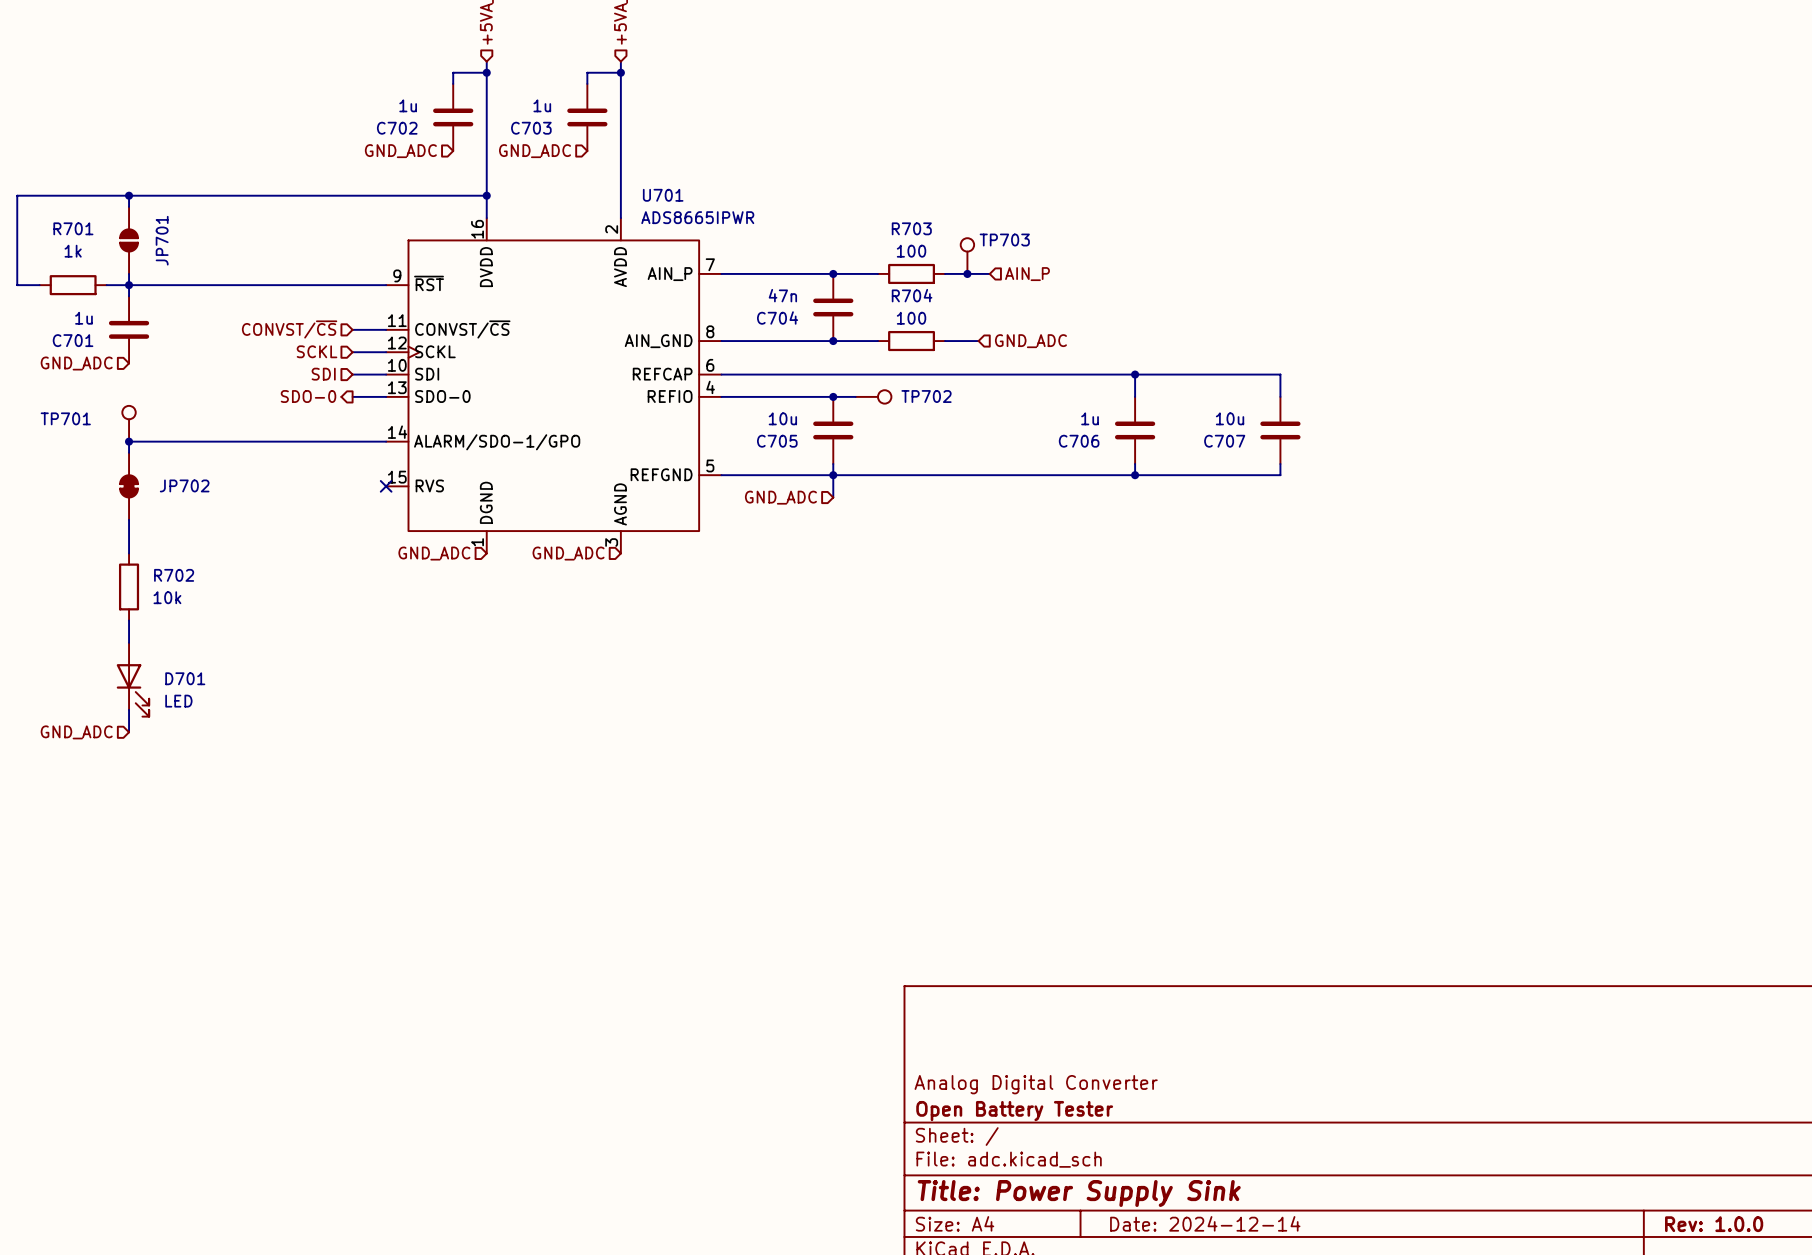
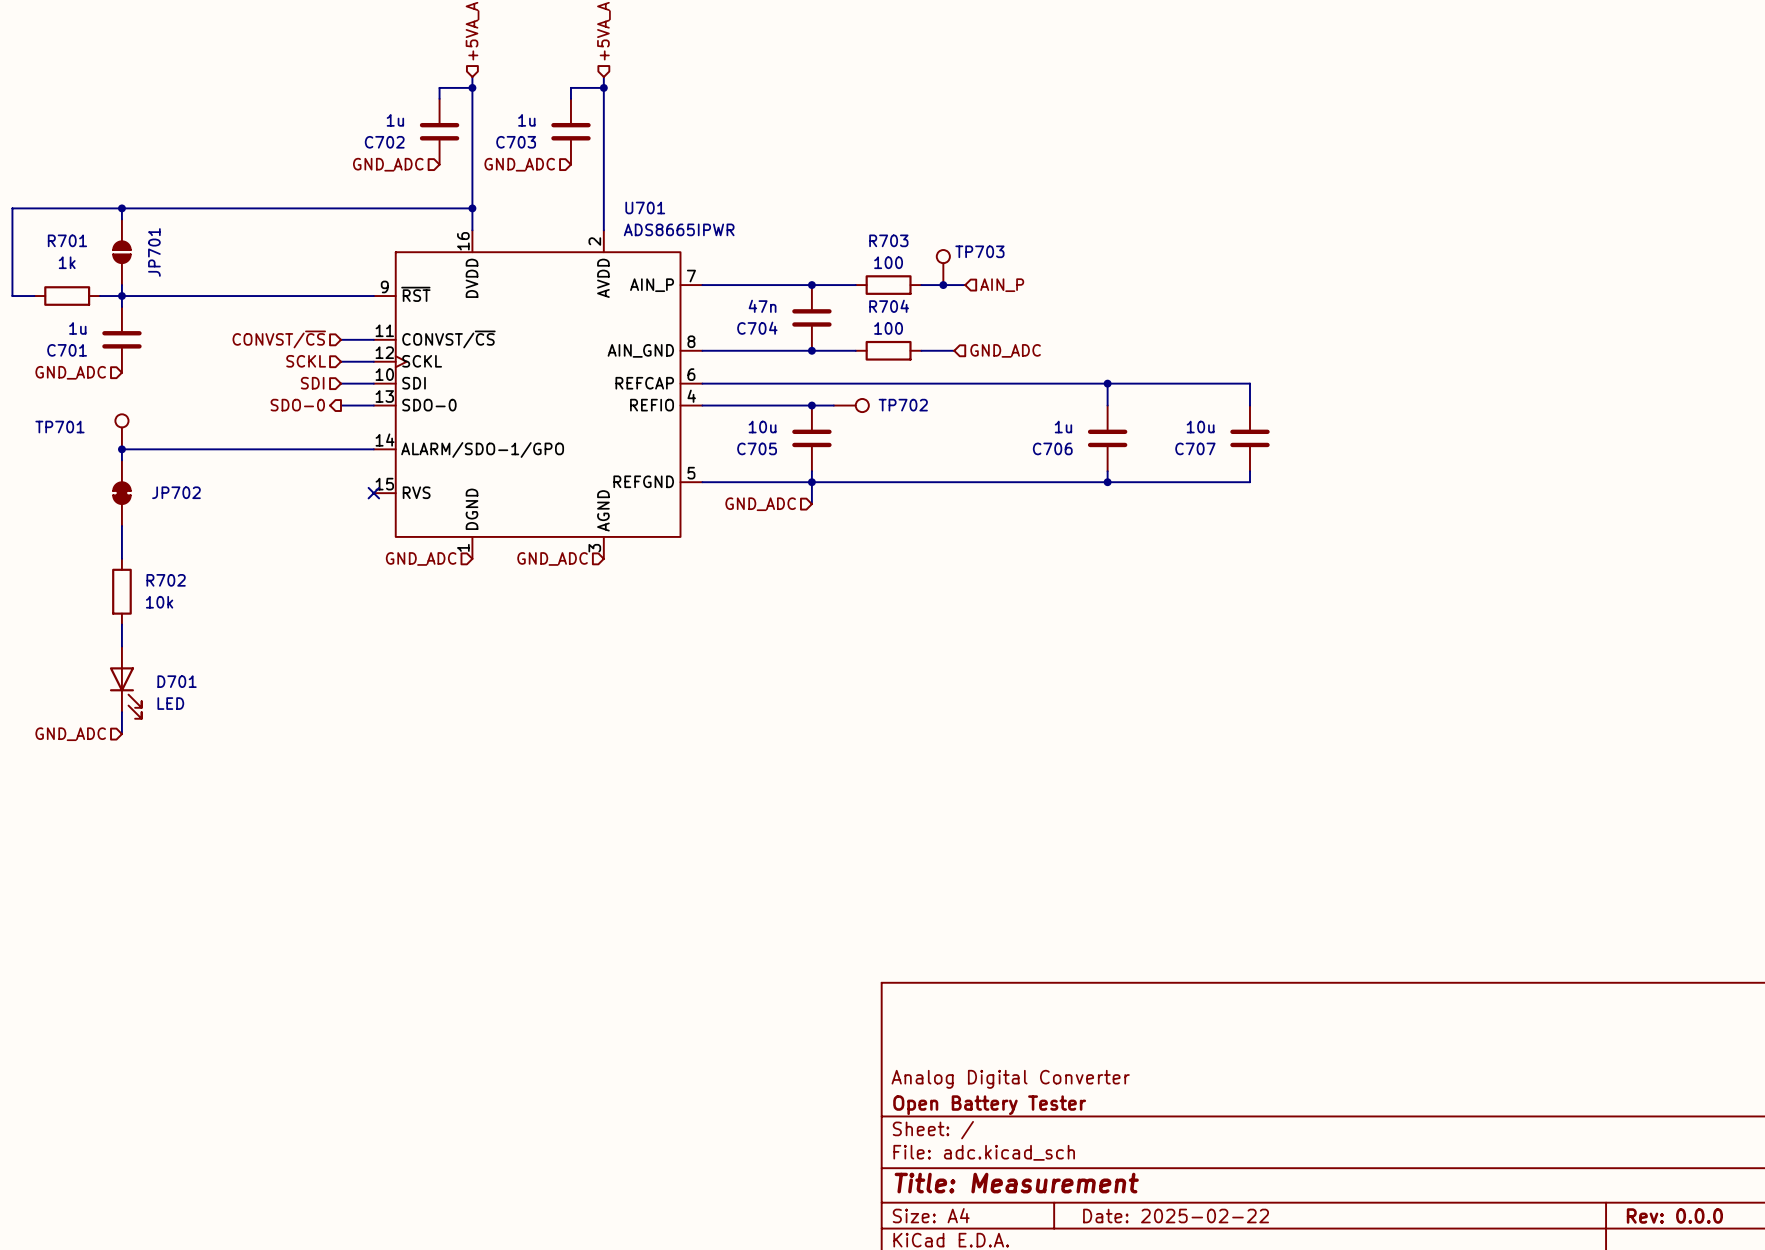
title block: Title: Power Supply Sink (1079, 1193) -> Title: Measurement (1016, 1183)
title block: Date: 2024-12-14 (1205, 1223) -> Date: 2025-02-22 (1176, 1216)
title block: Rev: 1.0.0 (1714, 1224) -> Rev: 0.0.0 (1674, 1216)

